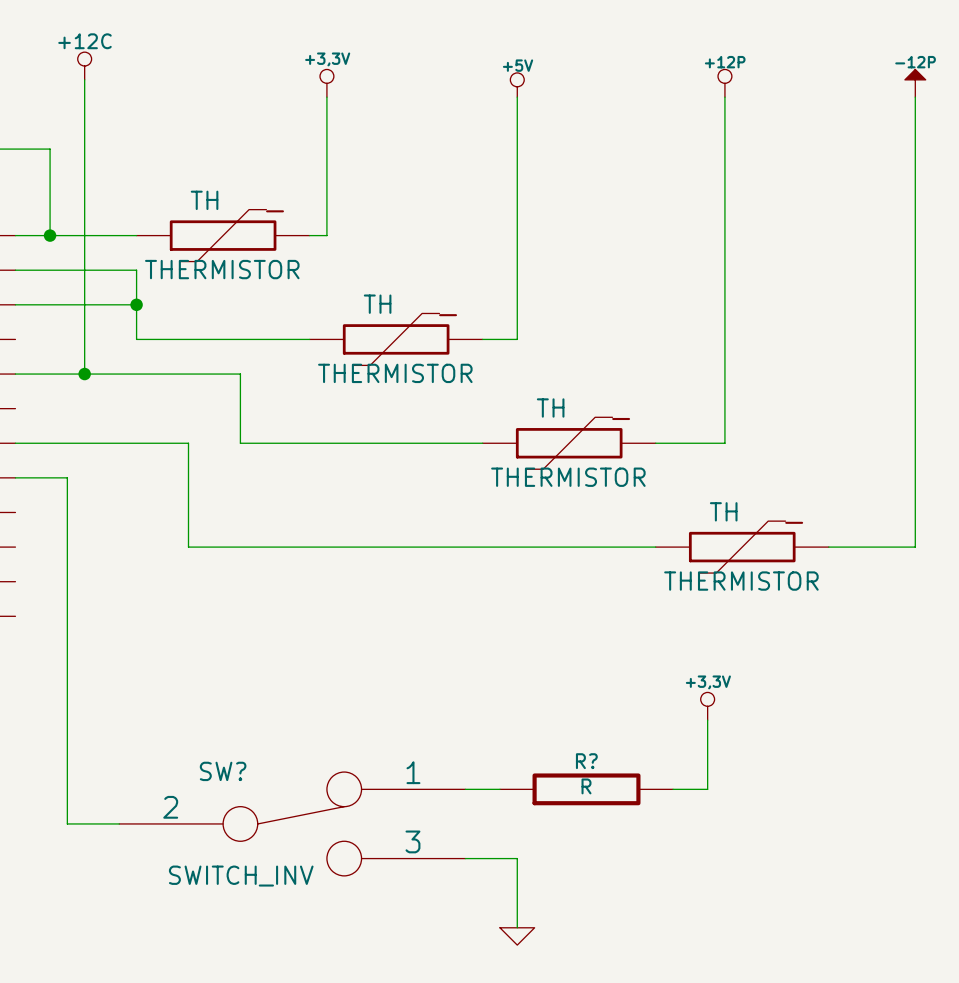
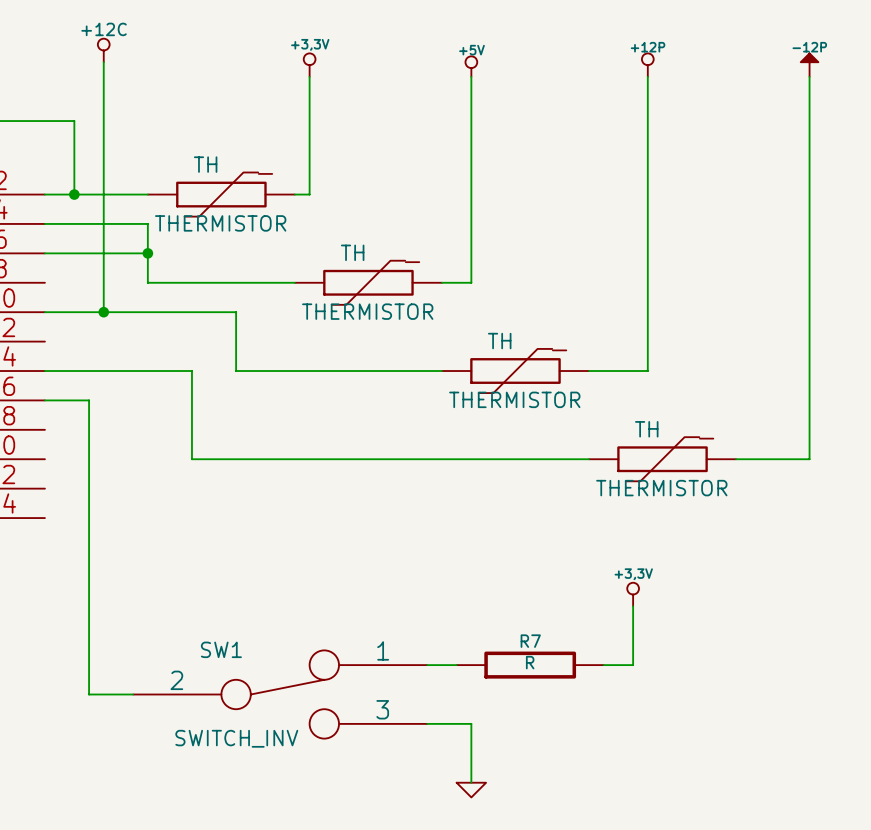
R? name: R? (586, 761) -> R7 (530, 641)
SW? name: SW? (223, 771) -> SW1 (221, 649)

